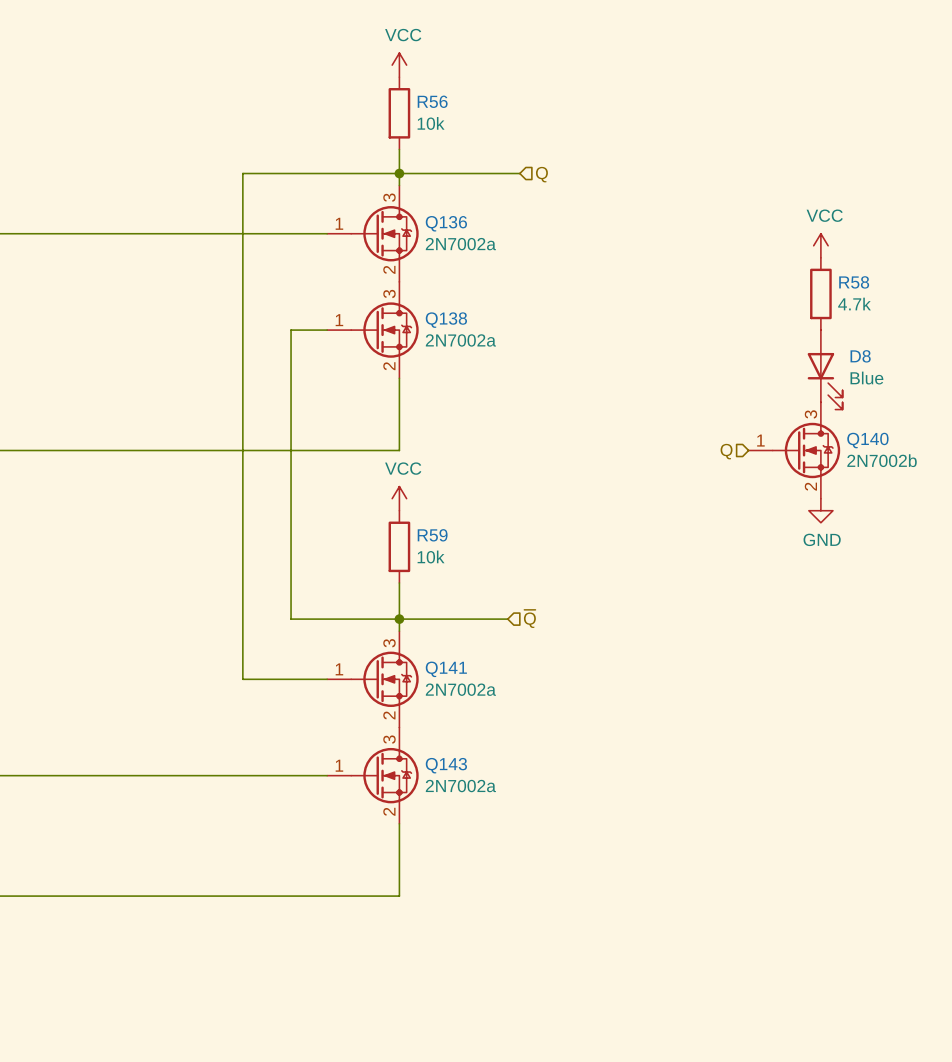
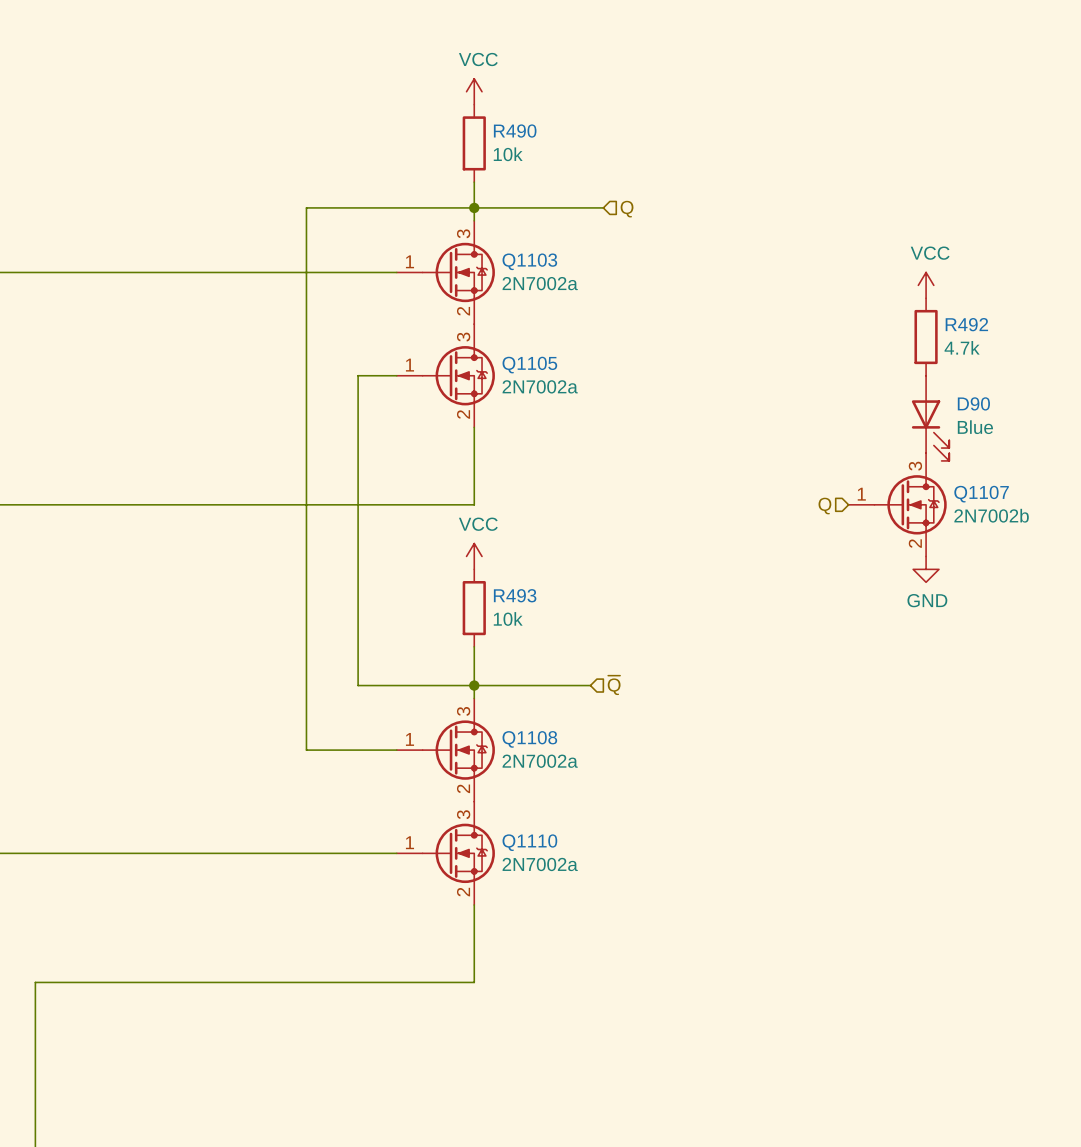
R56 name: R56 (432, 101) -> R490 (515, 131)
Q136 name: Q136 (446, 223) -> Q1103 (529, 261)
R58 name: R58 (854, 282) -> R492 (966, 324)
Q138 name: Q138 (446, 320) -> Q1105 (529, 365)
D8 name: D8 (860, 356) -> D90 (973, 403)
Q140 name: Q140 (867, 440) -> Q1107 (981, 494)
R59 name: R59 (432, 535) -> R493 (515, 595)
Q141 name: Q141 (446, 669) -> Q1108 (529, 739)
Q143 name: Q143 (446, 765) -> Q1110 (529, 842)

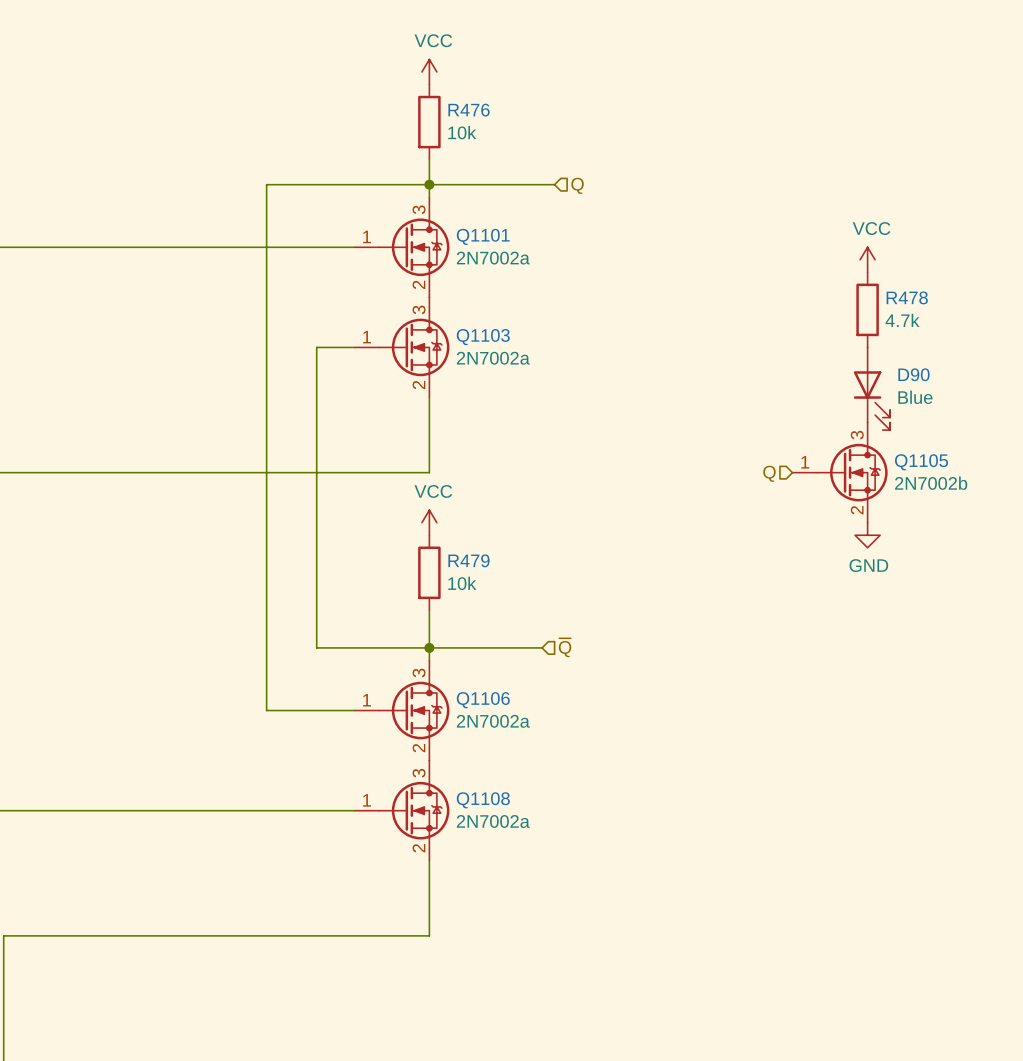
R490 name: R490 (515, 131) -> R476 (469, 110)
Q1103 name: Q1103 (529, 261) -> Q1101 (483, 236)
R492 name: R492 (966, 324) -> R478 (907, 297)
Q1105 name: Q1105 (529, 365) -> Q1103 (483, 337)
Q1107 name: Q1107 (981, 494) -> Q1105 (921, 462)
R493 name: R493 (515, 595) -> R479 (468, 560)
Q1108 name: Q1108 (529, 739) -> Q1106 (483, 700)
Q1110 name: Q1110 (529, 842) -> Q1108 (483, 800)

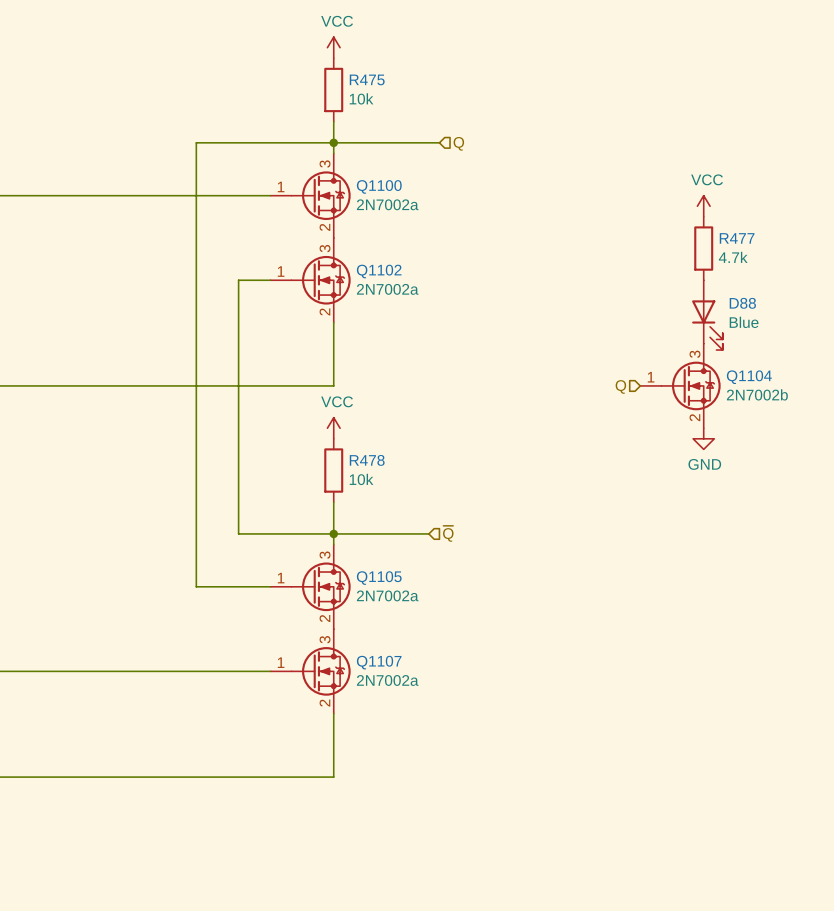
R476 name: R476 (469, 110) -> R475 (367, 79)
Q1101 name: Q1101 (483, 236) -> Q1100 (379, 186)
R478 name: R478 (907, 297) -> R477 (737, 238)
Q1103 name: Q1103 (483, 337) -> Q1102 (379, 271)
D90 name: D90 (913, 374) -> D88 (742, 303)
Q1105 name: Q1105 (921, 462) -> Q1104 (749, 377)
R479 name: R479 (468, 560) -> R478 (367, 460)
Q1106 name: Q1106 (483, 700) -> Q1105 (379, 578)
Q1108 name: Q1108 (483, 800) -> Q1107 (379, 662)

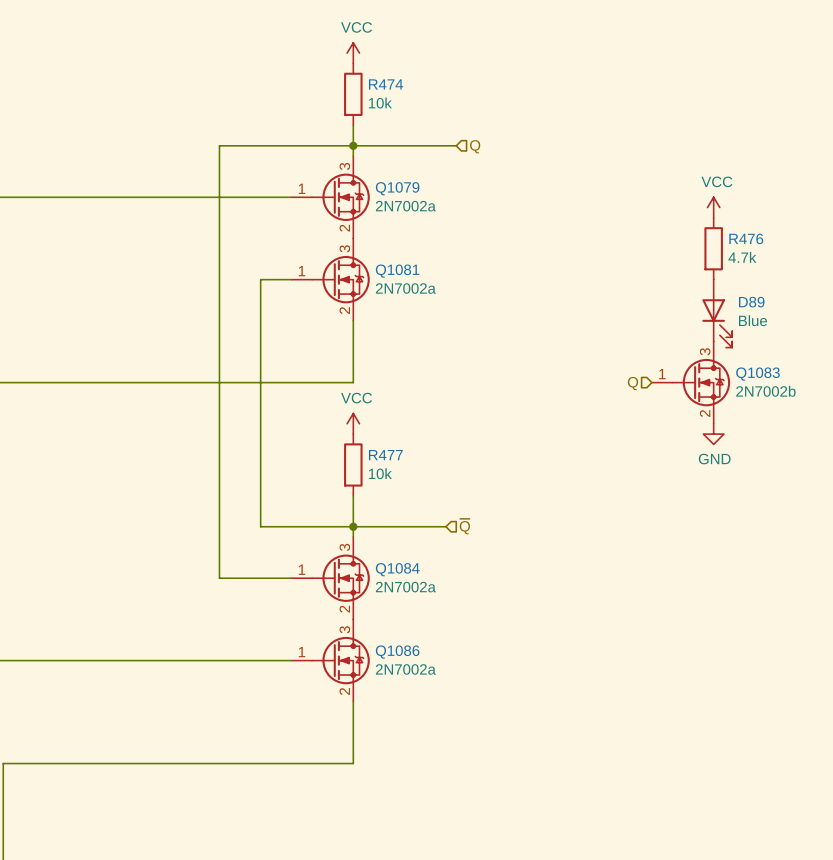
R475 name: R475 (367, 79) -> R474 (386, 84)
Q1100 name: Q1100 (379, 186) -> Q1079 (397, 188)
R477 name: R477 (737, 238) -> R476 (746, 238)
Q1102 name: Q1102 (379, 271) -> Q1081 (397, 271)
D88 name: D88 (742, 303) -> D89 (751, 302)
Q1104 name: Q1104 (749, 377) -> Q1083 (757, 374)
R478 name: R478 (367, 460) -> R477 (385, 455)
Q1105 name: Q1105 (379, 578) -> Q1084 (397, 569)
Q1107 name: Q1107 (379, 662) -> Q1086 (397, 652)

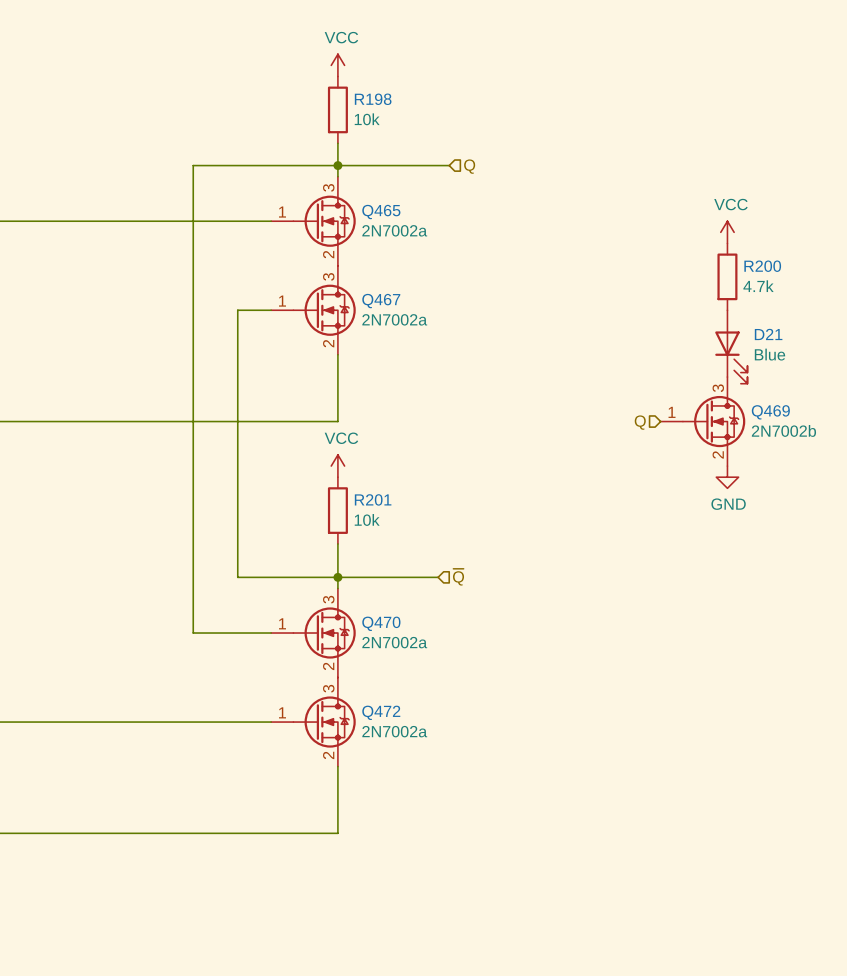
R474 name: R474 (386, 84) -> R198 (373, 99)
Q1079 name: Q1079 (397, 188) -> Q465 (381, 212)
R476 name: R476 (746, 238) -> R200 (762, 266)
Q1081 name: Q1081 (397, 271) -> Q467 (381, 301)
D89 name: D89 (751, 302) -> D21 (768, 334)
Q1083 name: Q1083 (757, 374) -> Q469 (770, 412)
R477 name: R477 (385, 455) -> R201 (373, 499)
Q1084 name: Q1084 (397, 569) -> Q470 (381, 623)
Q1086 name: Q1086 (397, 652) -> Q472 (381, 712)

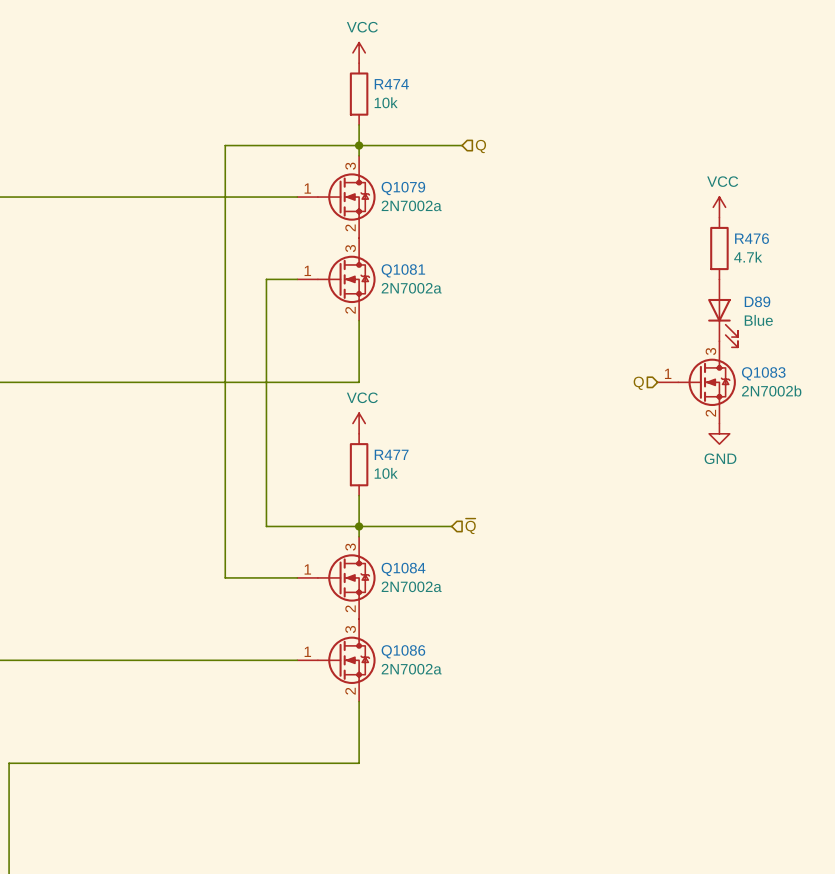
R198 name: R198 (373, 99) -> R474 (391, 84)
Q465 name: Q465 (381, 212) -> Q1079 (403, 188)
R200 name: R200 (762, 266) -> R476 (752, 238)
Q467 name: Q467 (381, 301) -> Q1081 (403, 270)
D21 name: D21 (768, 334) -> D89 (757, 301)
Q469 name: Q469 (770, 412) -> Q1083 (763, 373)
R201 name: R201 (373, 499) -> R477 (391, 454)
Q470 name: Q470 (381, 623) -> Q1084 (403, 569)
Q472 name: Q472 (381, 712) -> Q1086 (403, 651)

